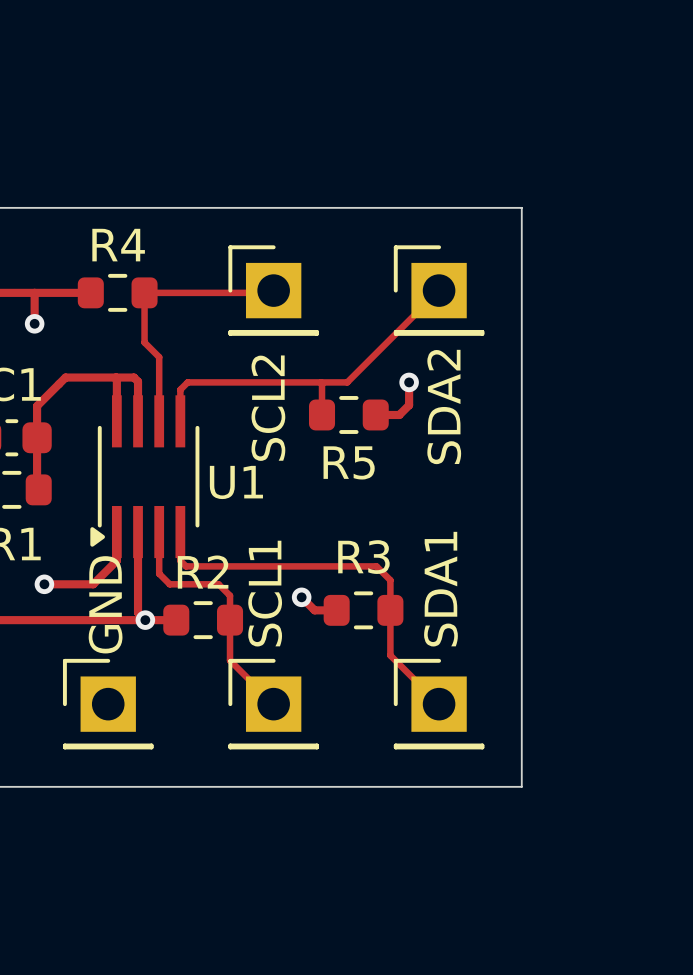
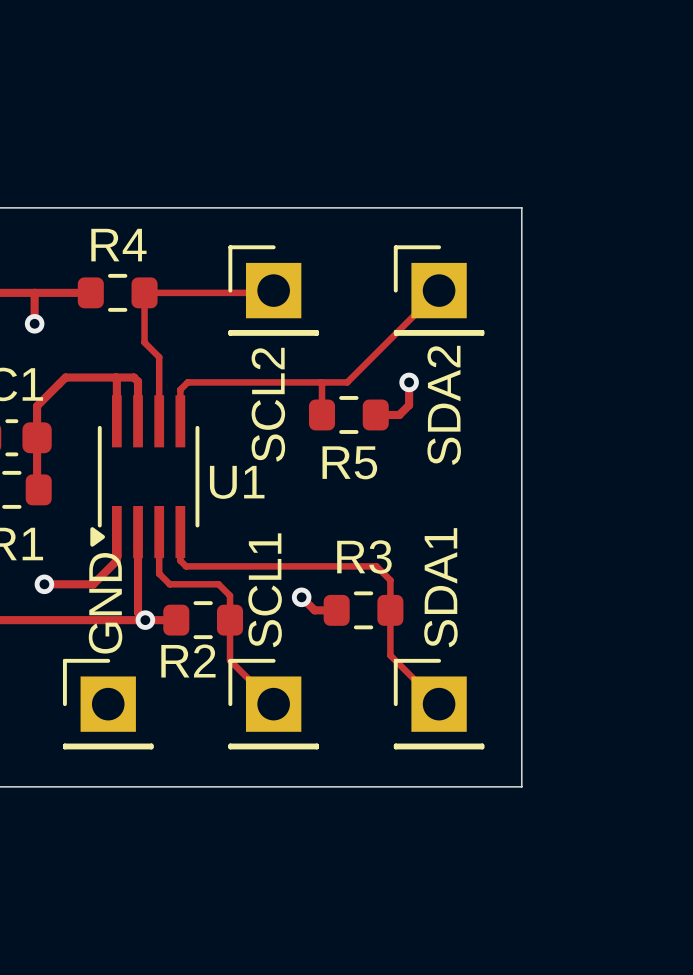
R2 name position: R2 (203, 572) -> R2 (188, 661)

